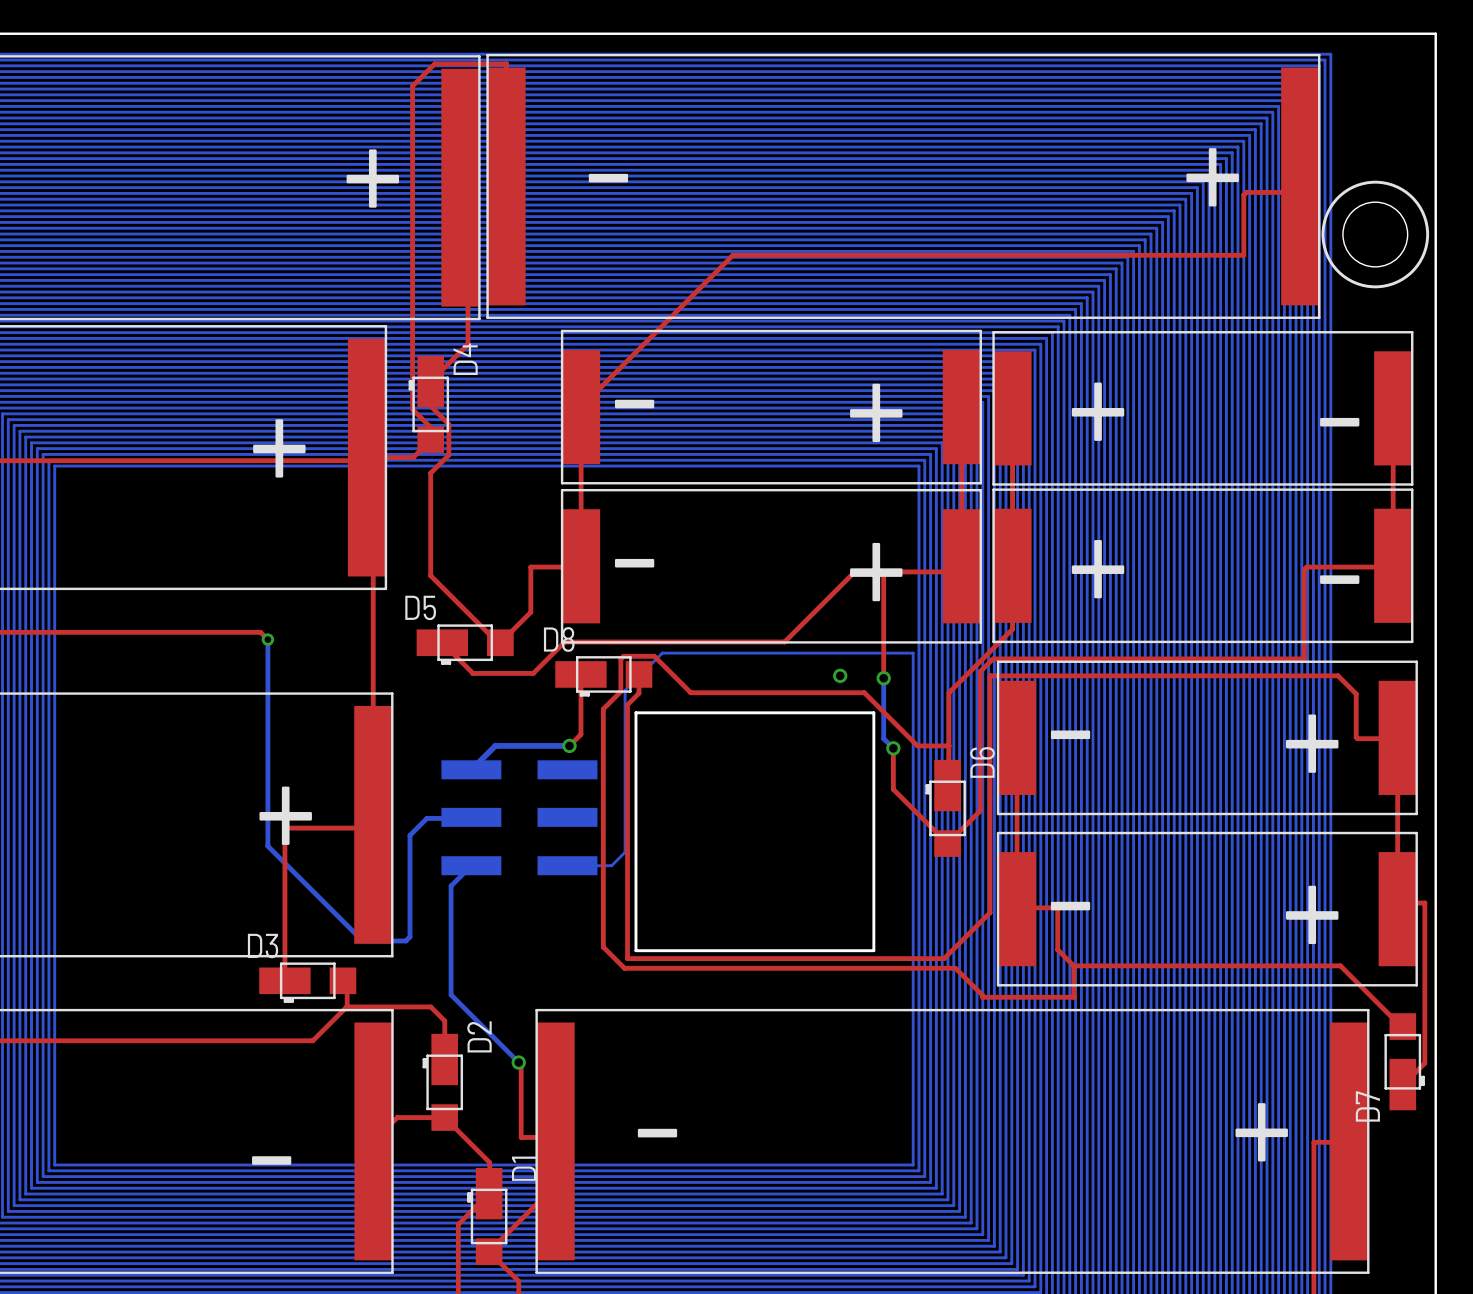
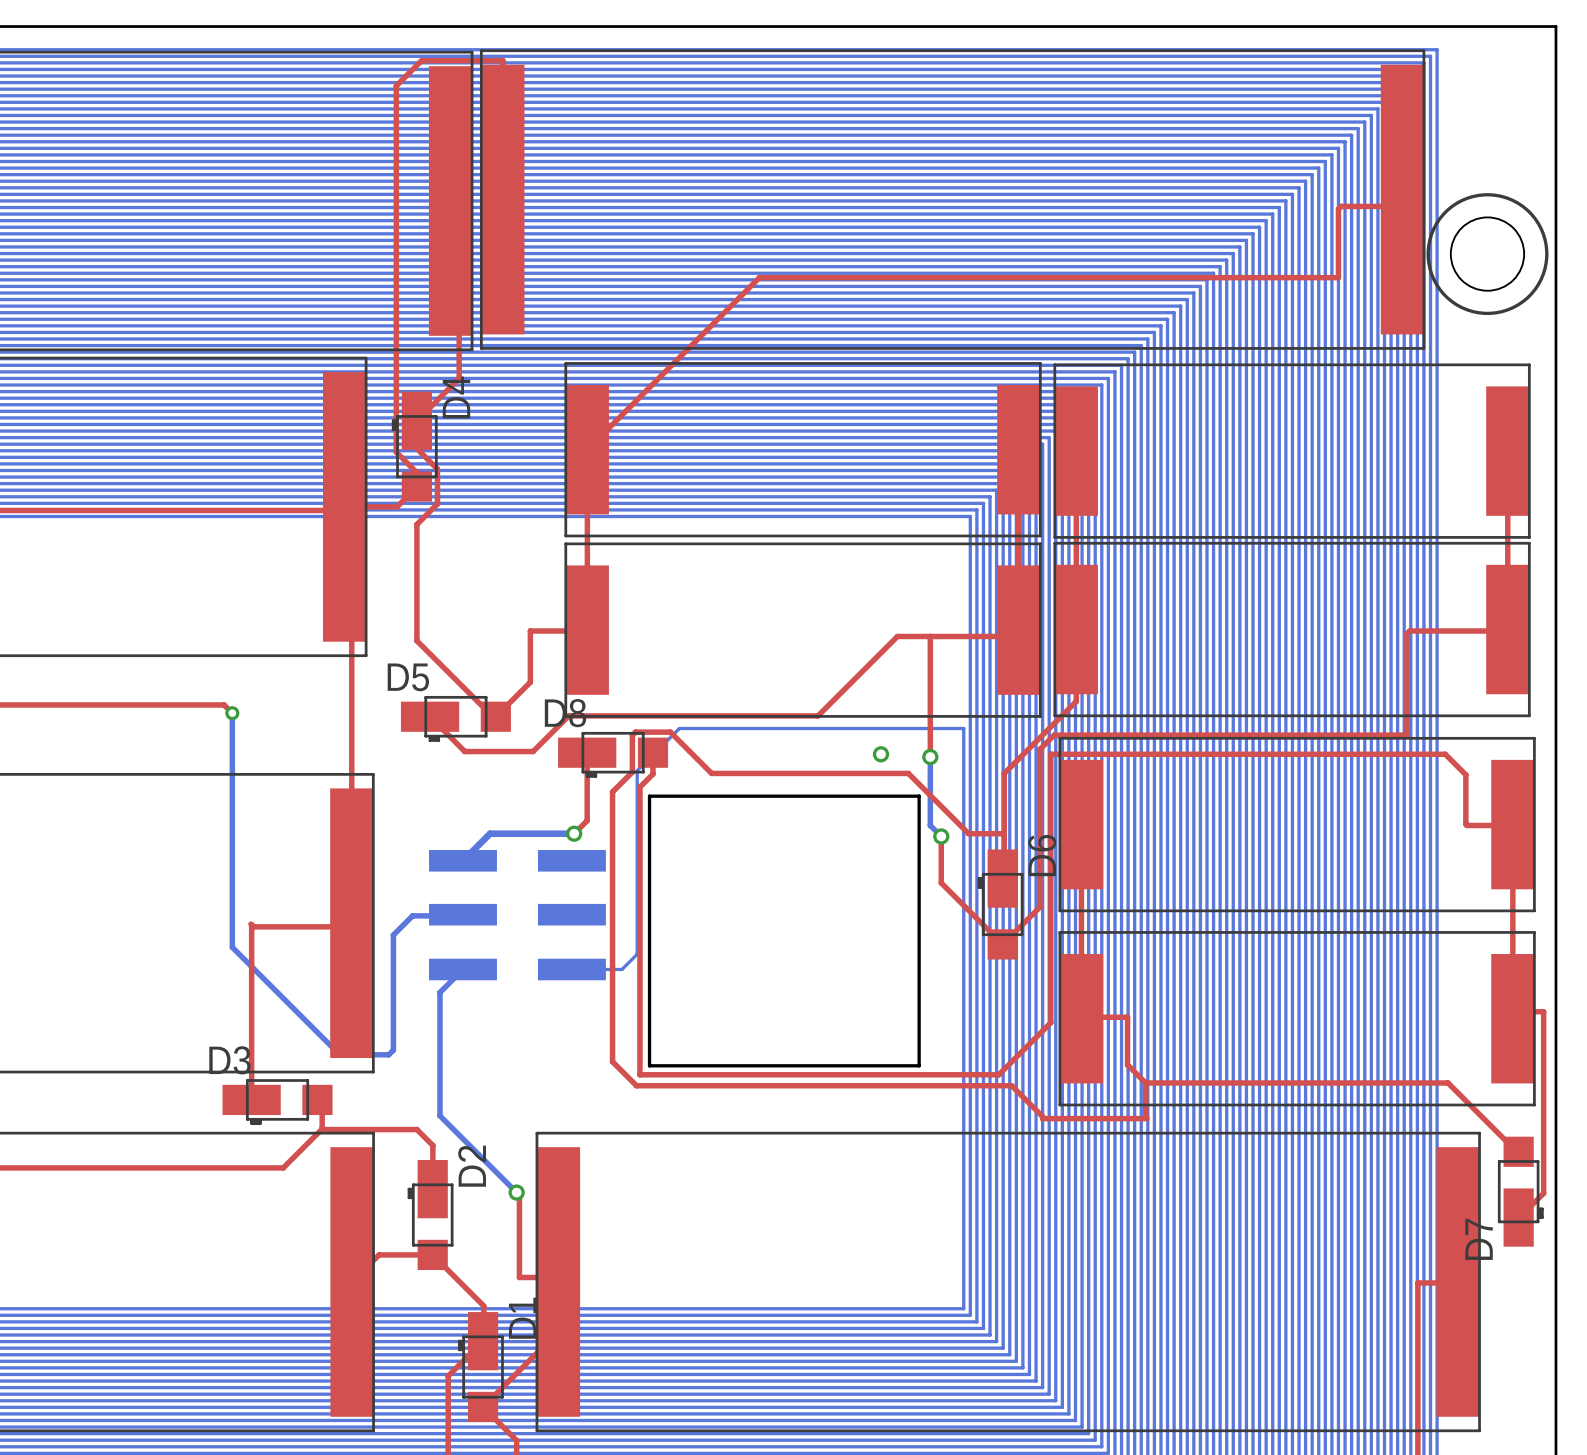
part text: + (1212, 177) -> none
part text: + (372, 178) -> none
part text: - (608, 178) -> none
part text: - (634, 404) -> none
part text: + (1098, 411) -> none
part text: + (876, 412) -> none
part text: - (1339, 422) -> none
part text: + (279, 448) -> none
part text: - (634, 563) -> none
part text: + (1098, 569) -> none
part text: + (876, 572) -> none
part text: - (1339, 579) -> none
part text: - (1070, 734) -> none
part text: + (1312, 743) -> none
part text: + (285, 815) -> none
part text: - (1070, 906) -> none
part text: + (1312, 914) -> none
part text: + (1261, 1132) -> none
part text: - (657, 1133) -> none
part text: - (271, 1160) -> none

